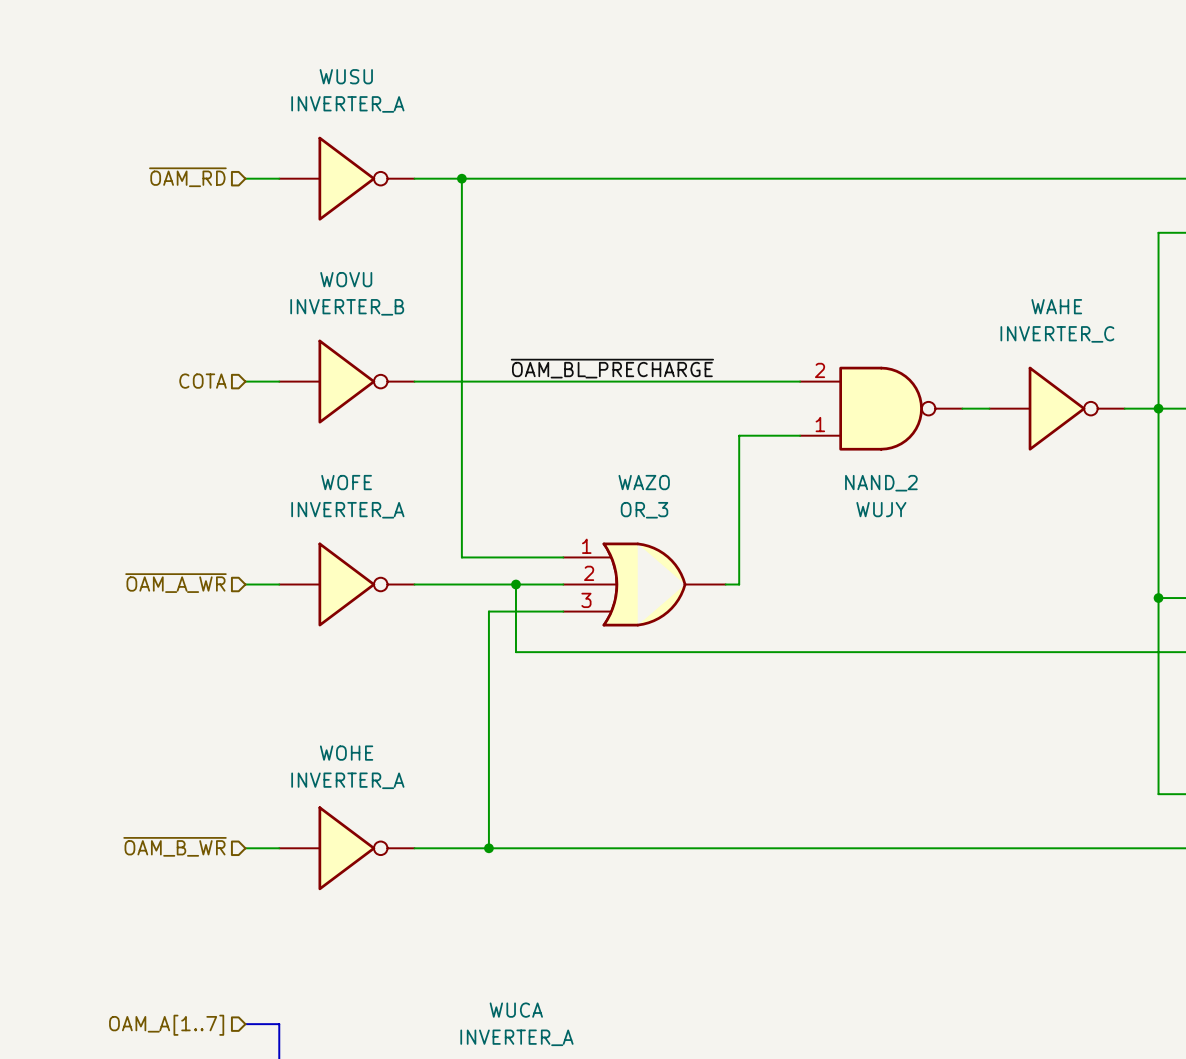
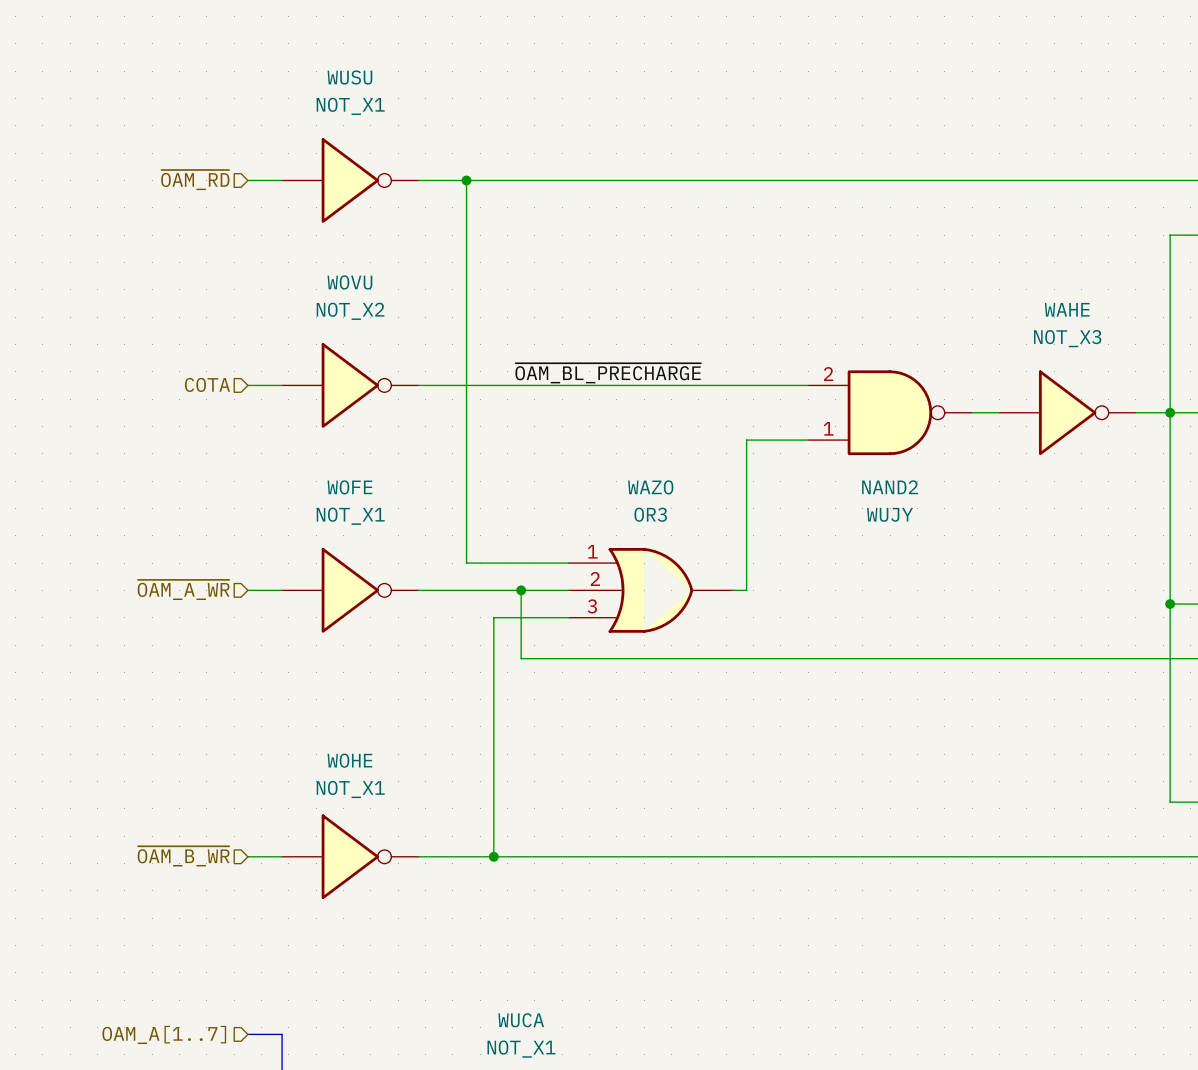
WUSU value: INVERTER_A (347, 104) -> NOT_X1 (350, 106)
WOVU value: INVERTER_B (347, 307) -> NOT_X2 (350, 311)
WAHE value: INVERTER_C (1057, 334) -> NOT_X3 (1067, 338)
WUJY value: NAND_2 (881, 483) -> NAND2 (890, 487)
WOFE value: INVERTER_A (347, 510) -> NOT_X1 (350, 516)
WAZO value: OR_3 (644, 510) -> OR3 (650, 514)
WOHE value: INVERTER_A (347, 780) -> NOT_X1 (350, 789)
WUCA value: INVERTER_A (516, 1037) -> NOT_X1 (521, 1049)

